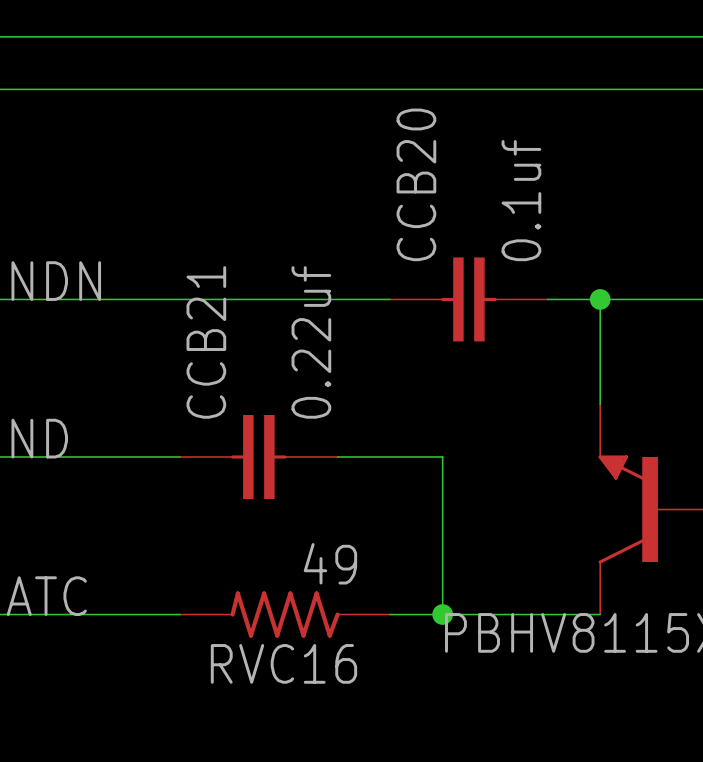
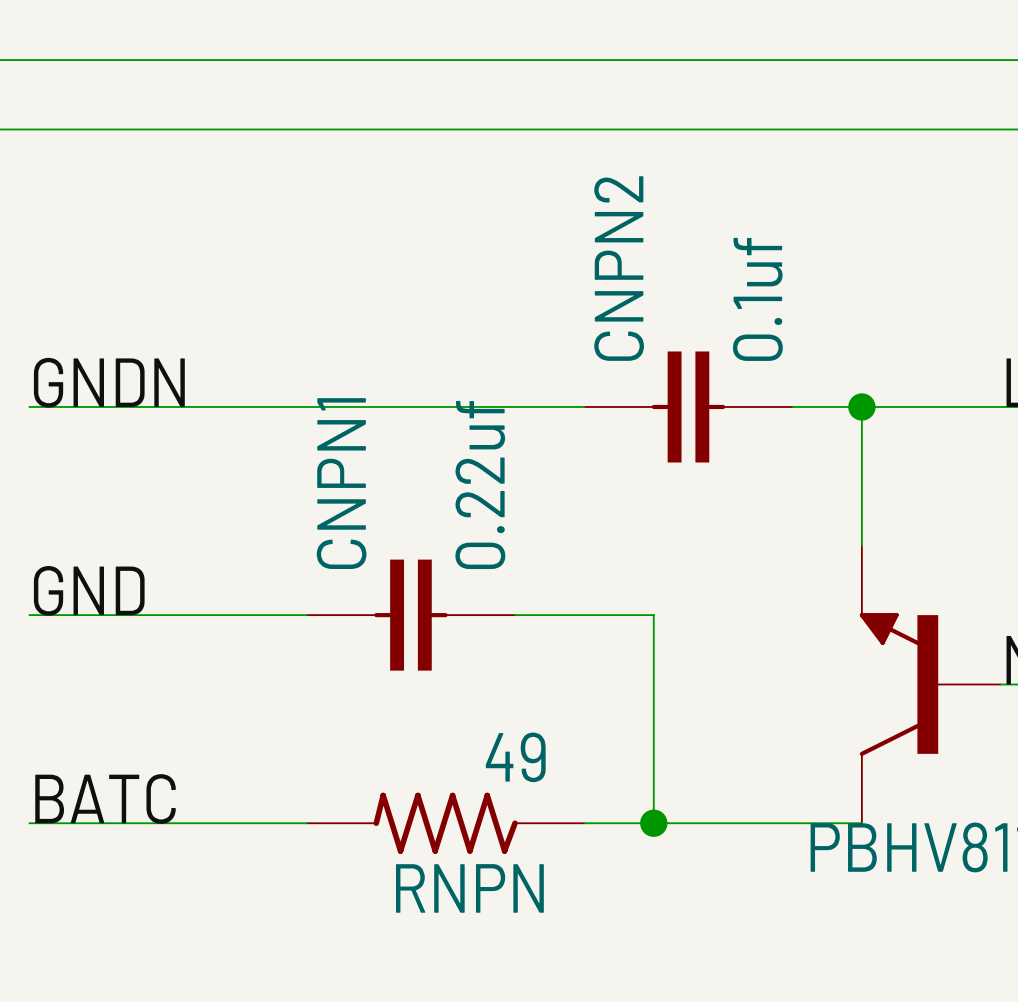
CCB20 name: CCB20 (416, 184) -> CNPN2 (619, 268)
CCB21 name: CCB21 (206, 342) -> CNPN1 (341, 483)
RVC16 name: RVC16 (283, 663) -> RNPN (469, 888)

